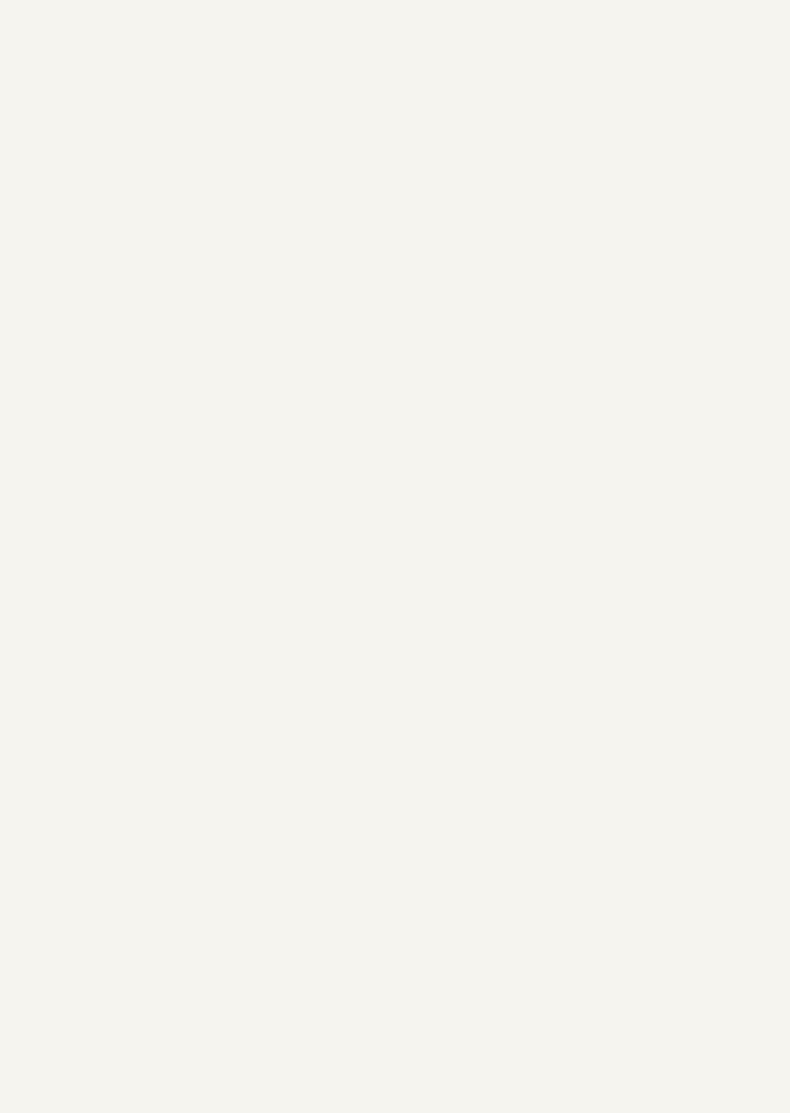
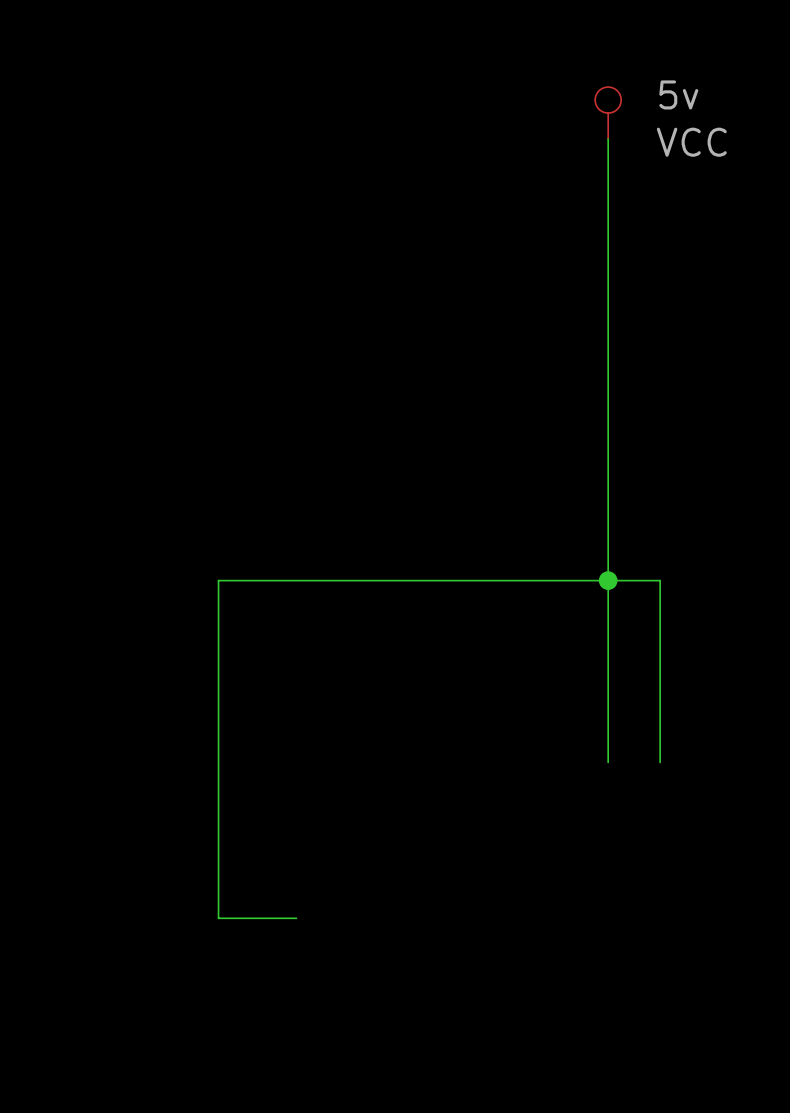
5v: none -> VCC (608, 113)
wire: none -> (608, 139) (608, 762)
junction: none -> (608, 580)
wire: none -> (660, 762) (660, 580) (218, 580) (218, 918) (296, 918)

